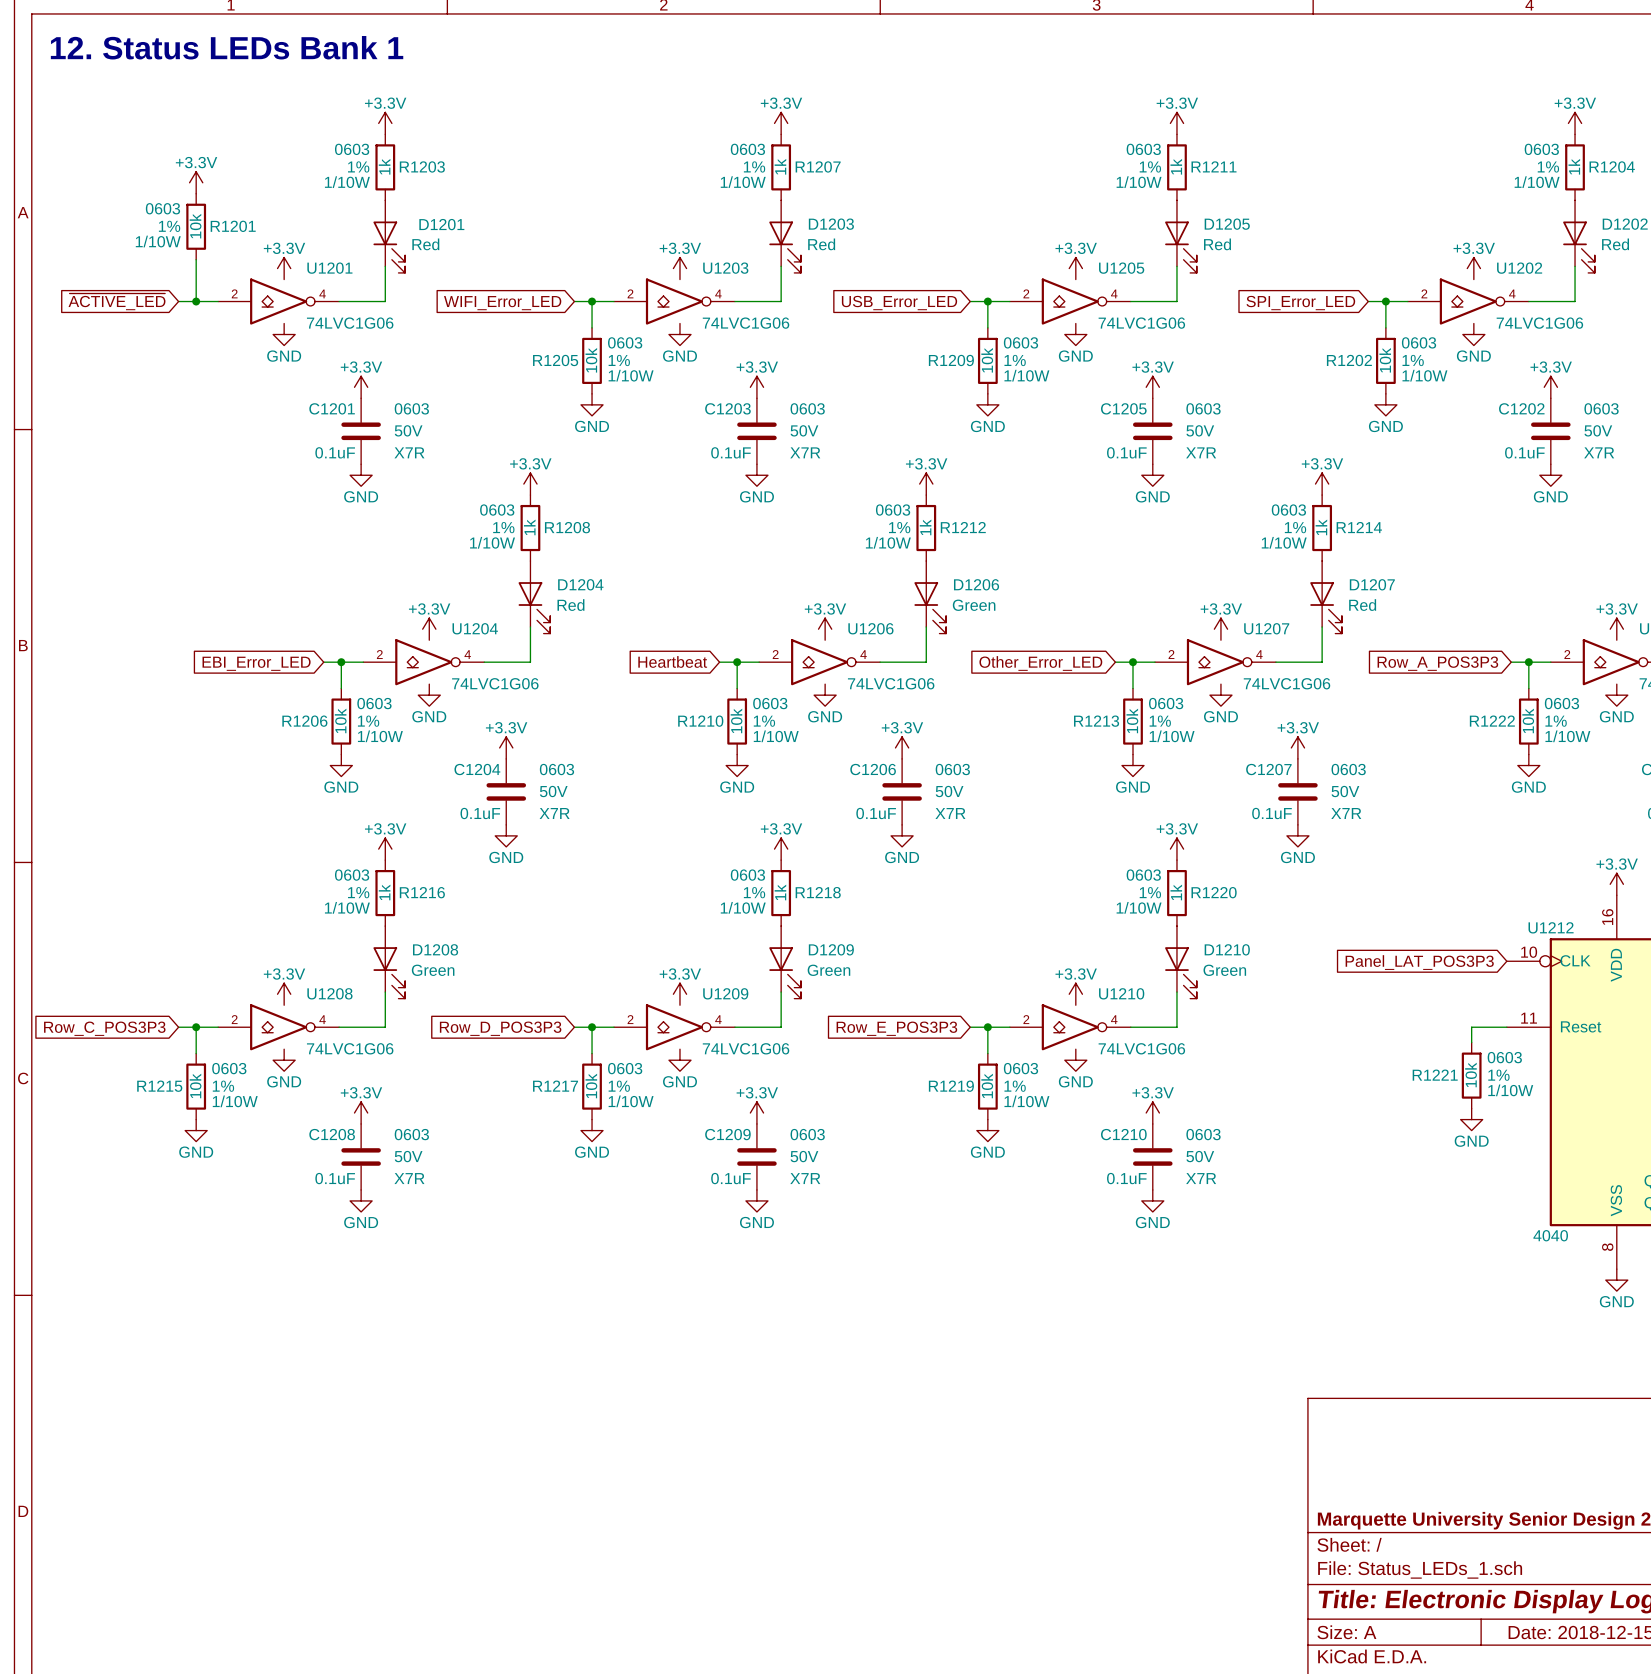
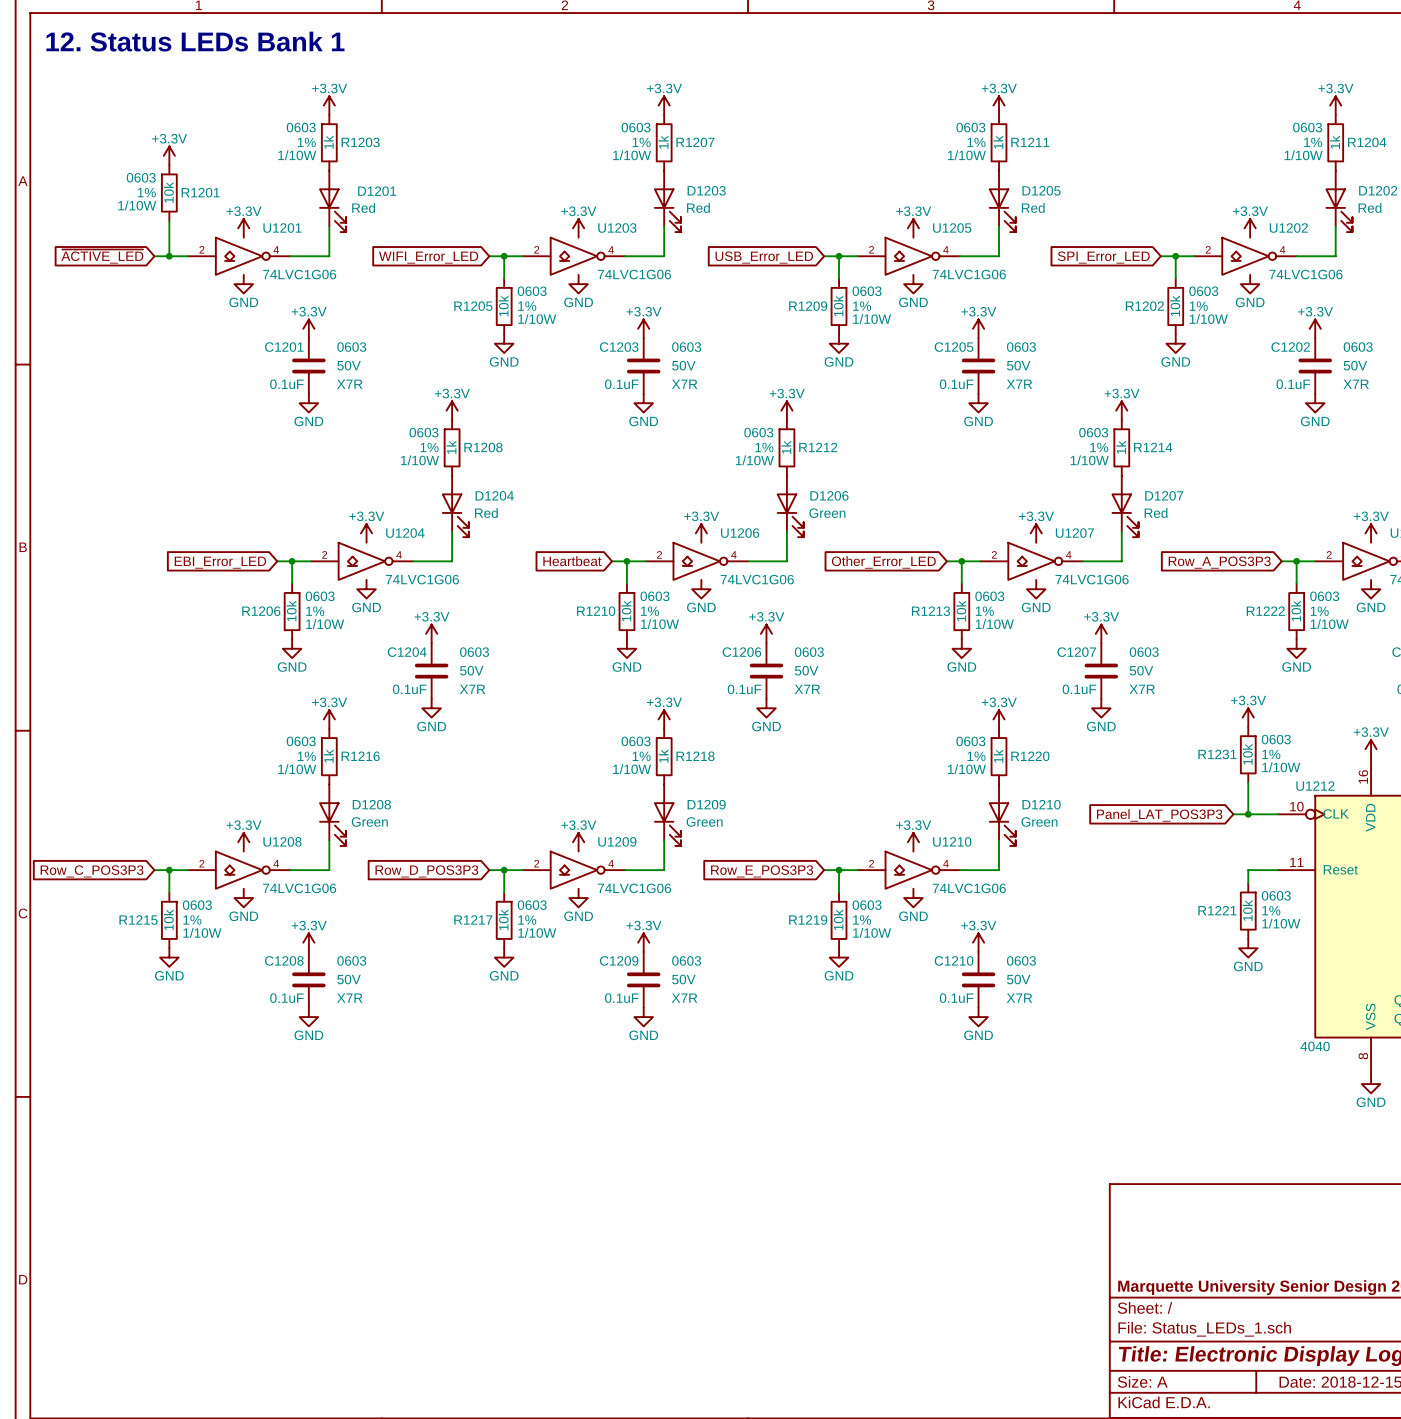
power symbol: none -> +3.3V (1248, 717)
R1231: none -> 10k (1248, 754)
wire: none -> (1248, 782) (1248, 814)
wire: none -> (1233, 814) (1278, 814)
junction: none -> (1248, 814)
global label position: Panel_LAT_POS3P3 (1419, 962) -> Panel_LAT_POS3P3 (1159, 815)

